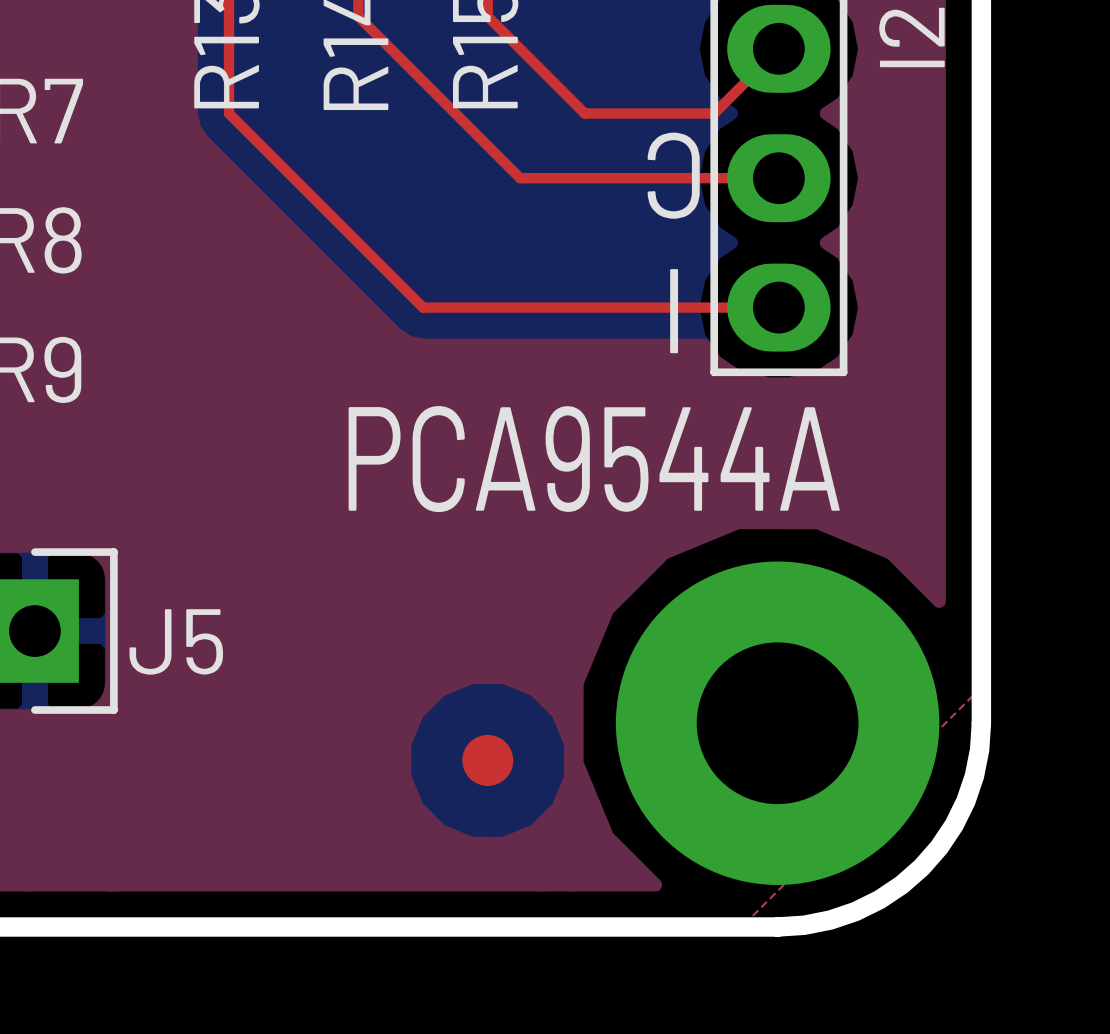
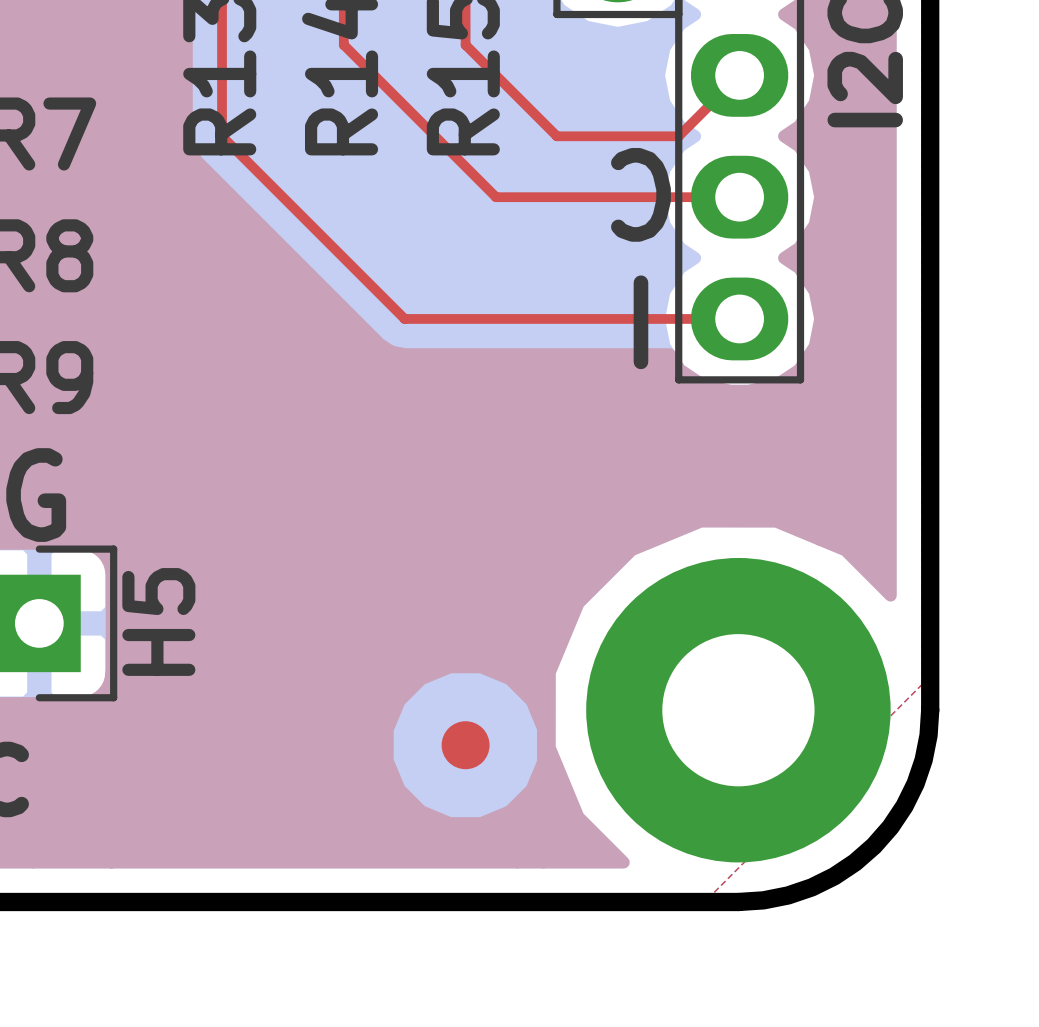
text: PCA9544A (594, 459) -> none
J5 name: J5 (176, 641) -> H5 (158, 621)

